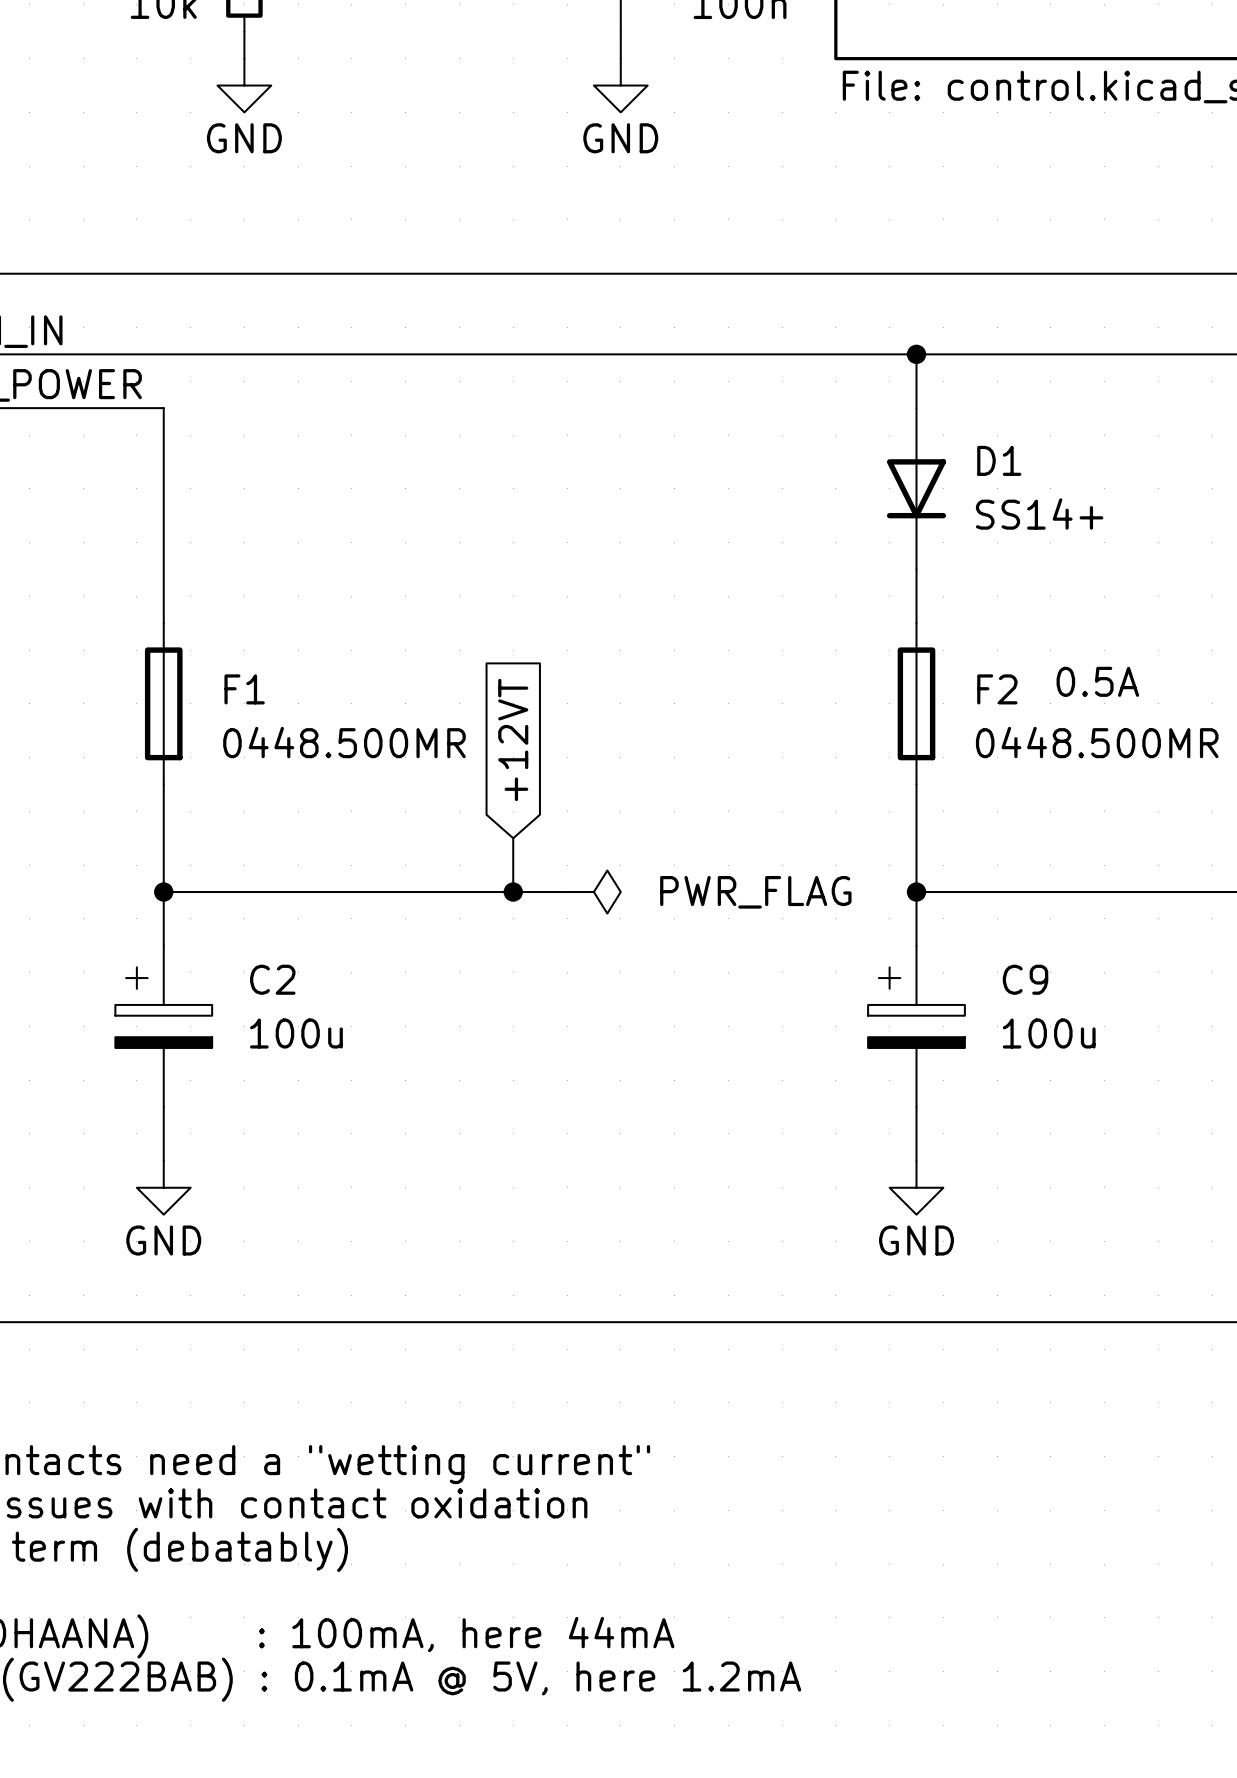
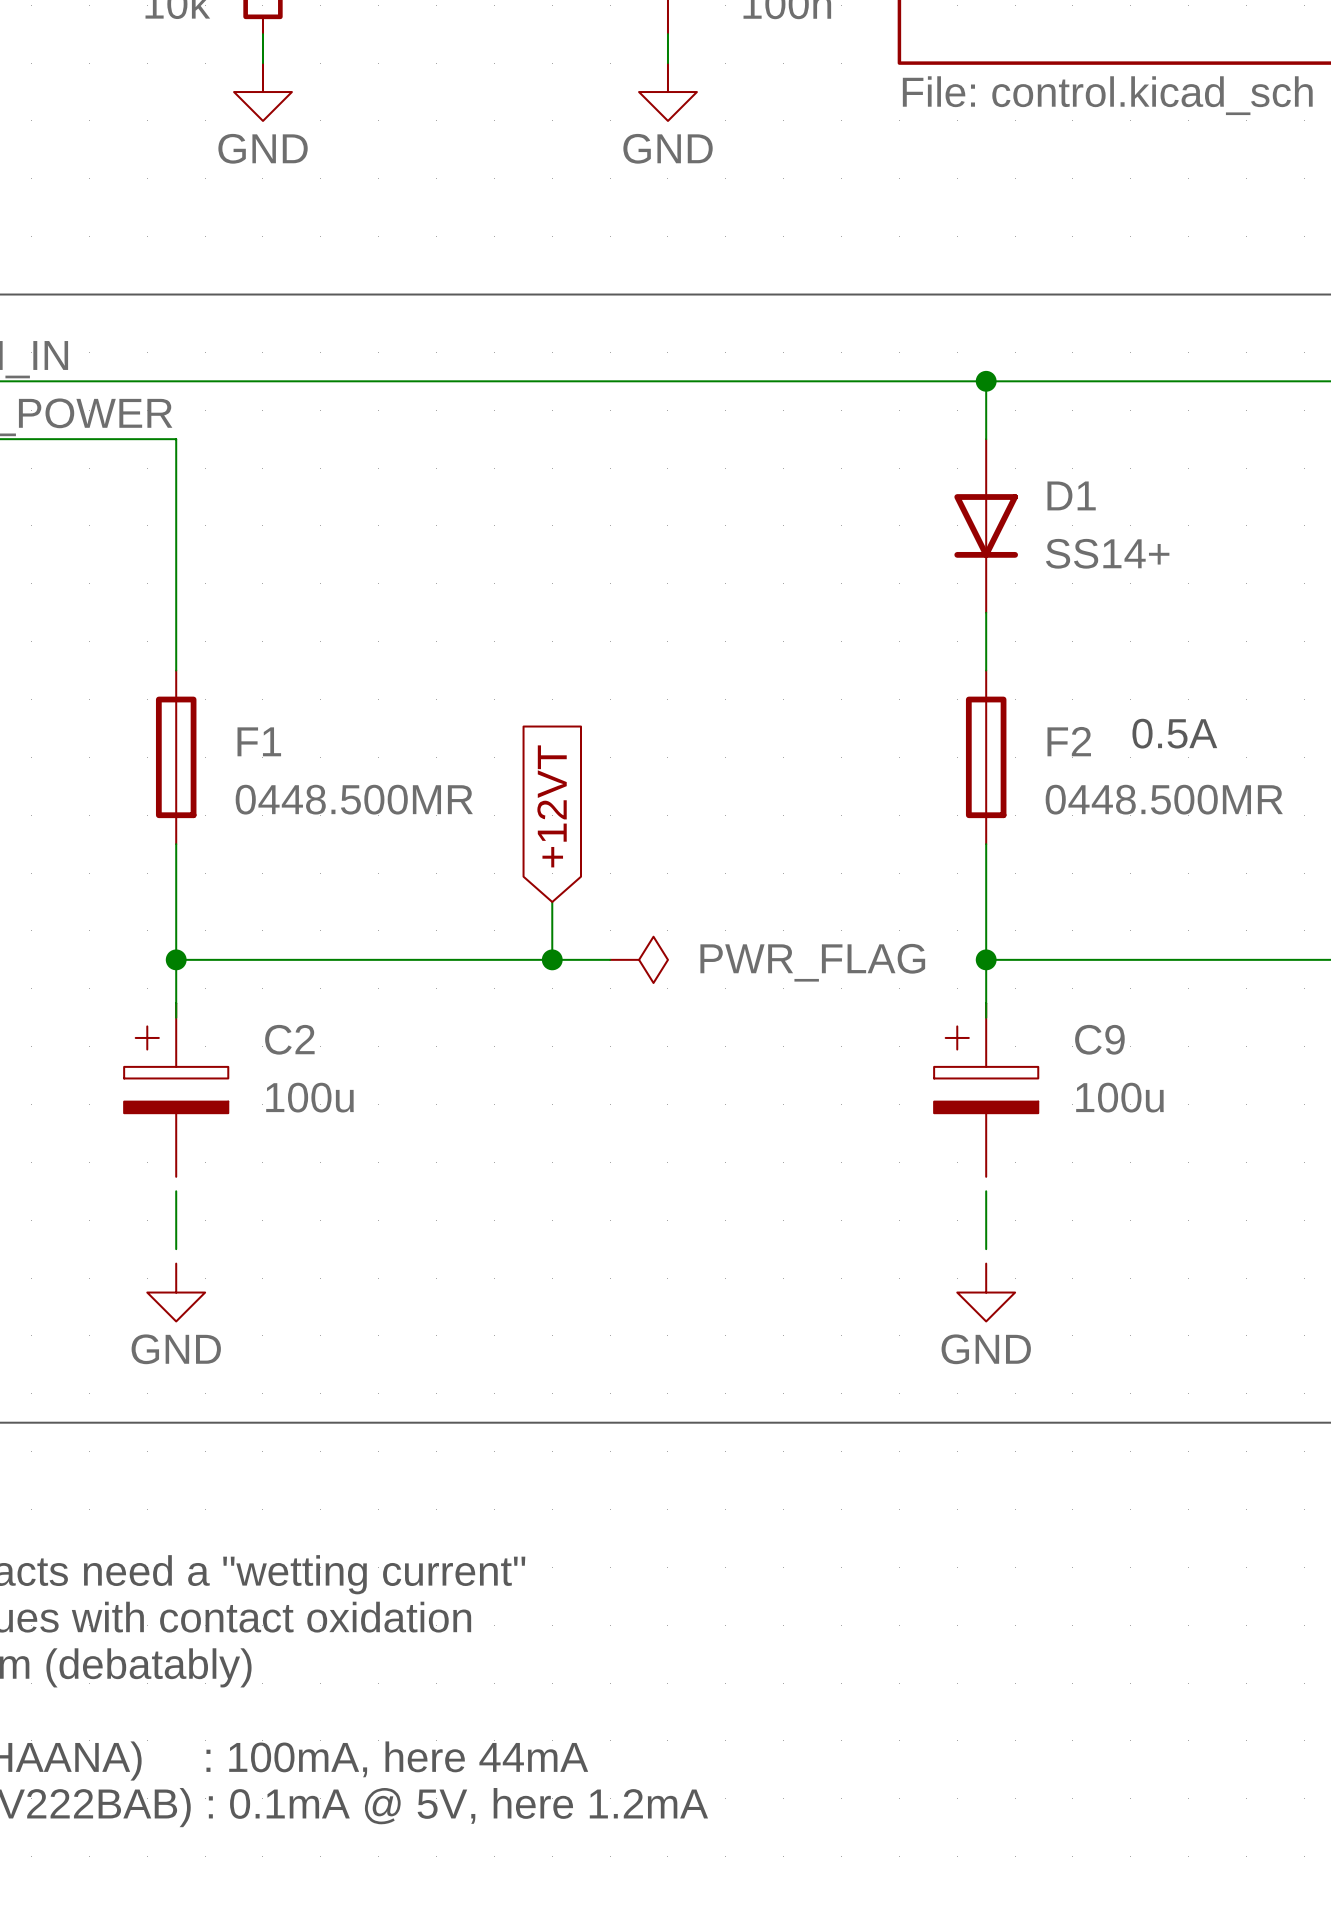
C2 position: (163, 1026) -> (176, 1090)
C9 position: (916, 1026) -> (986, 1090)
power symbol position: GND (163, 1187) -> GND (176, 1292)
power symbol position: GND (916, 1187) -> GND (986, 1292)

